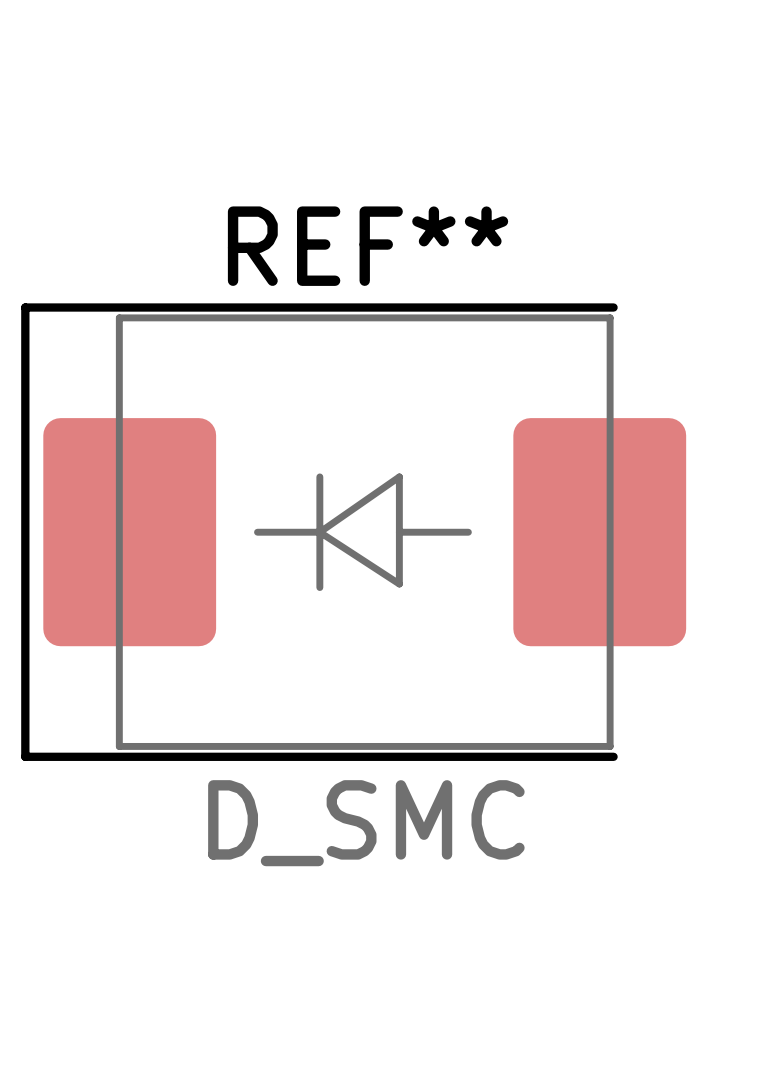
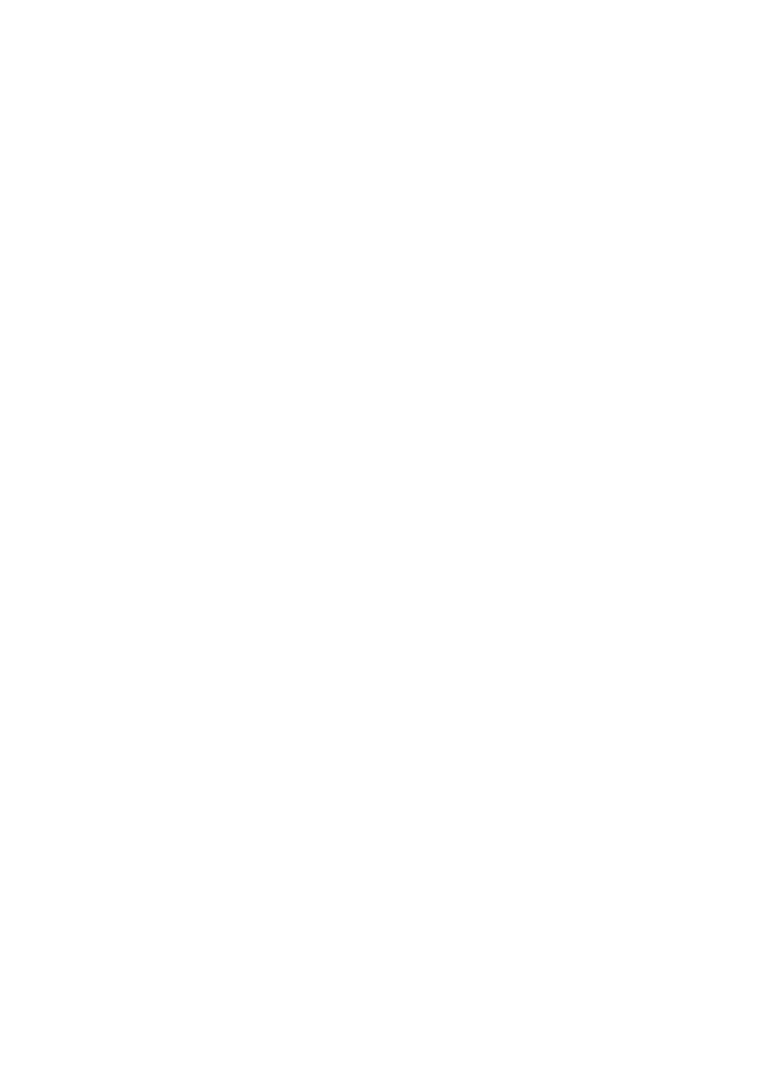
REF**: D_SMC (353, 532) -> none

